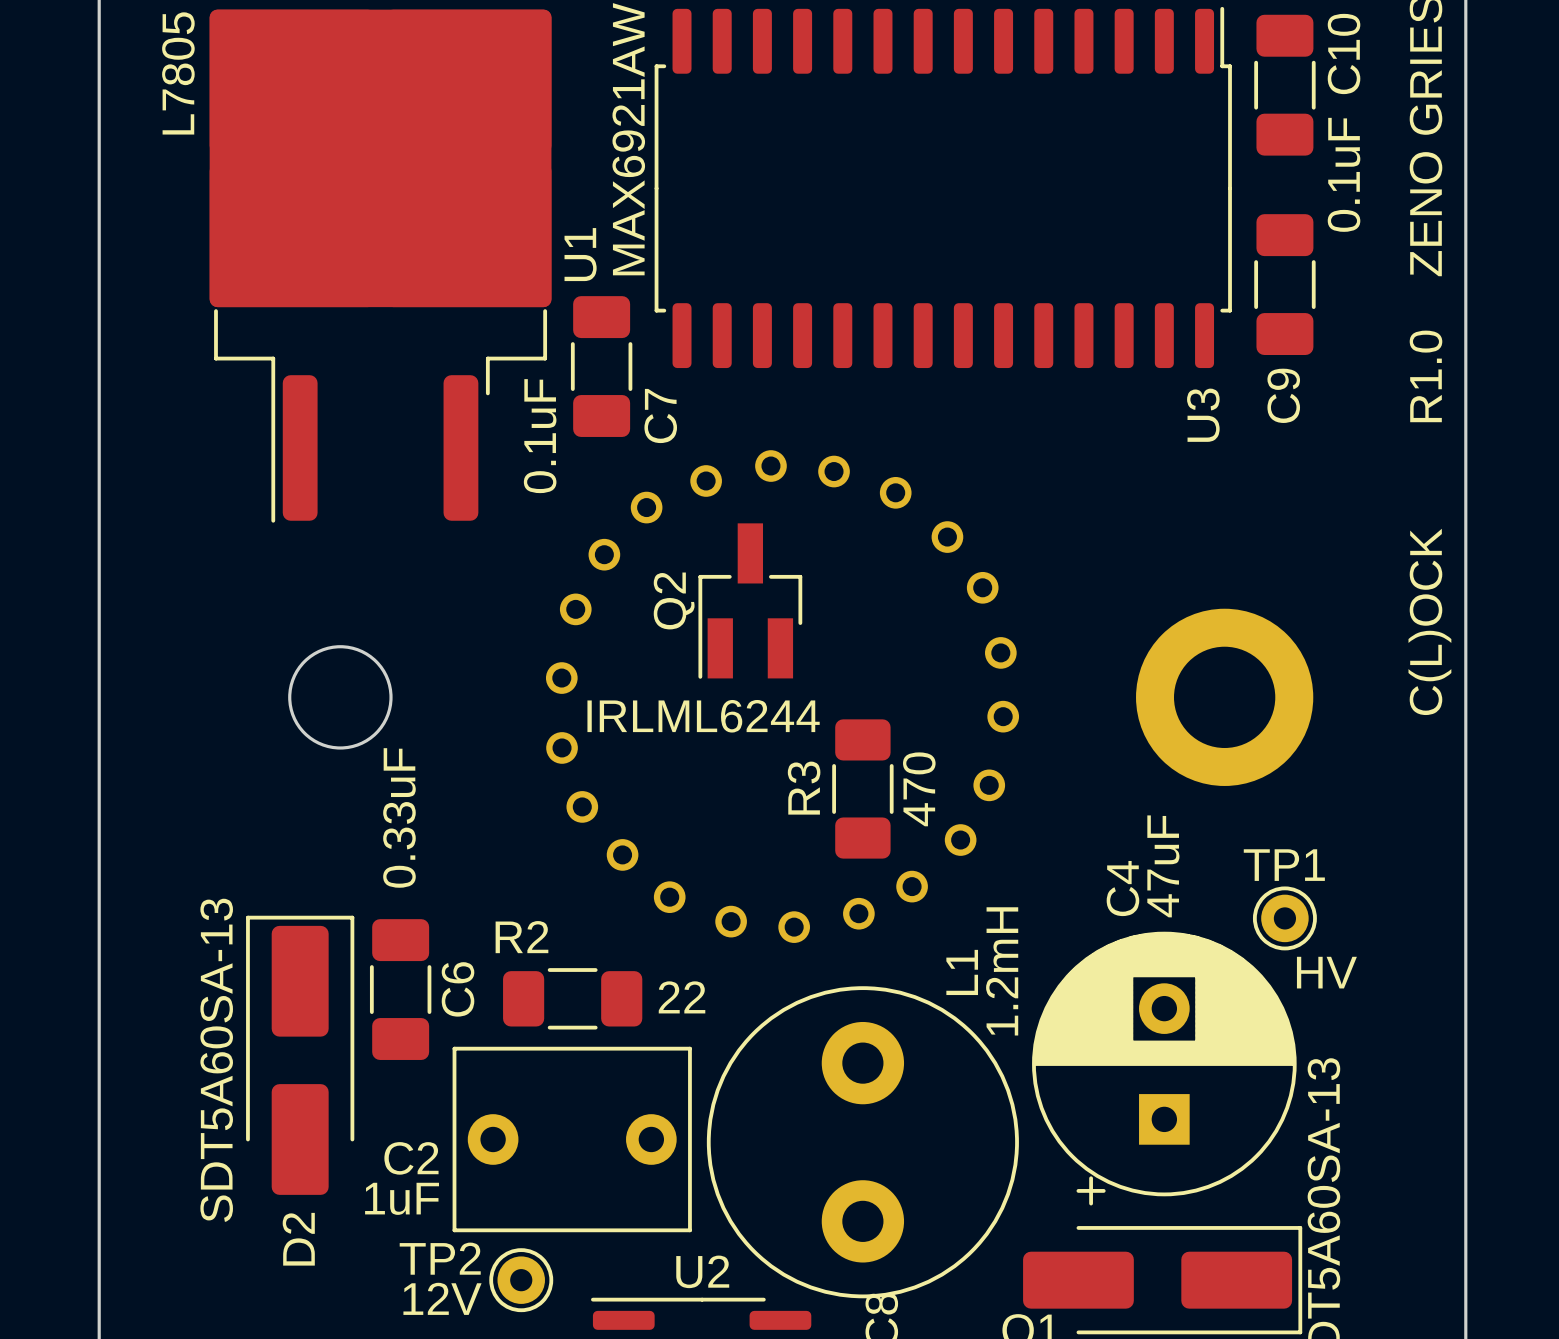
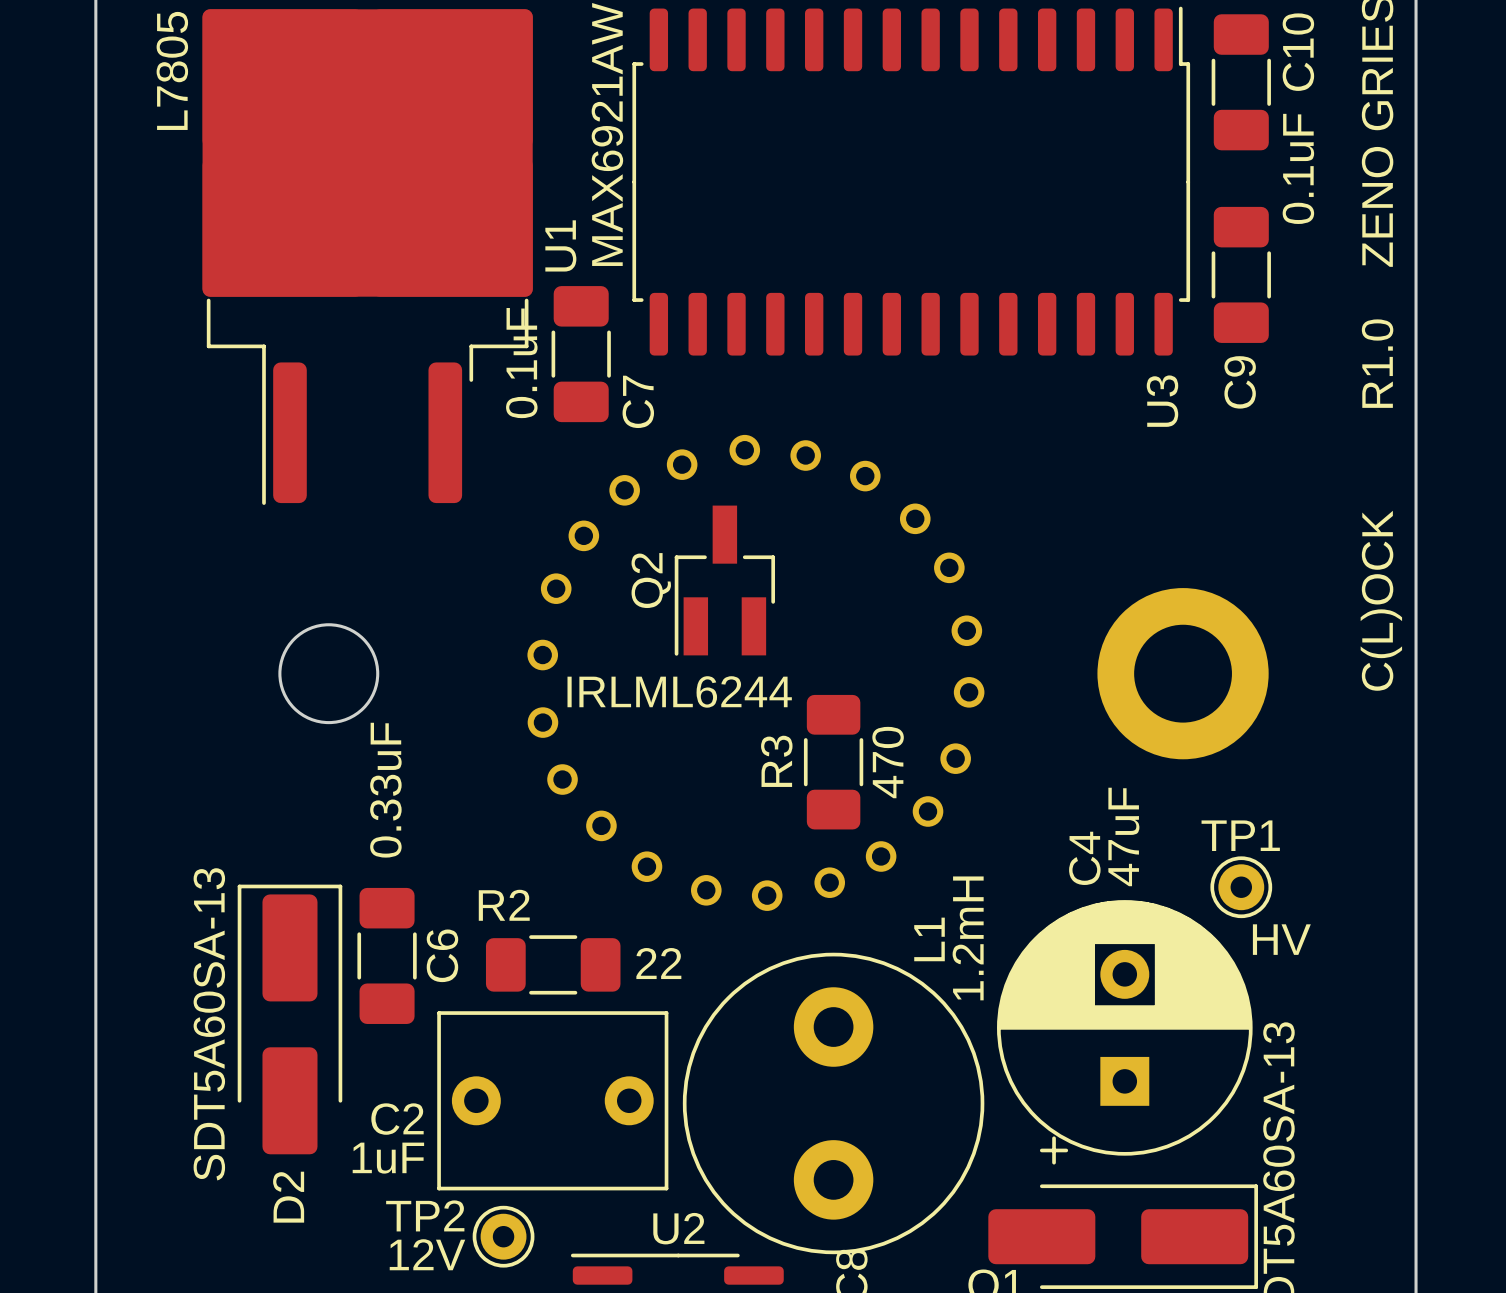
C7 value position: 0.1uF (540, 436) -> 0.1uF (521, 363)

